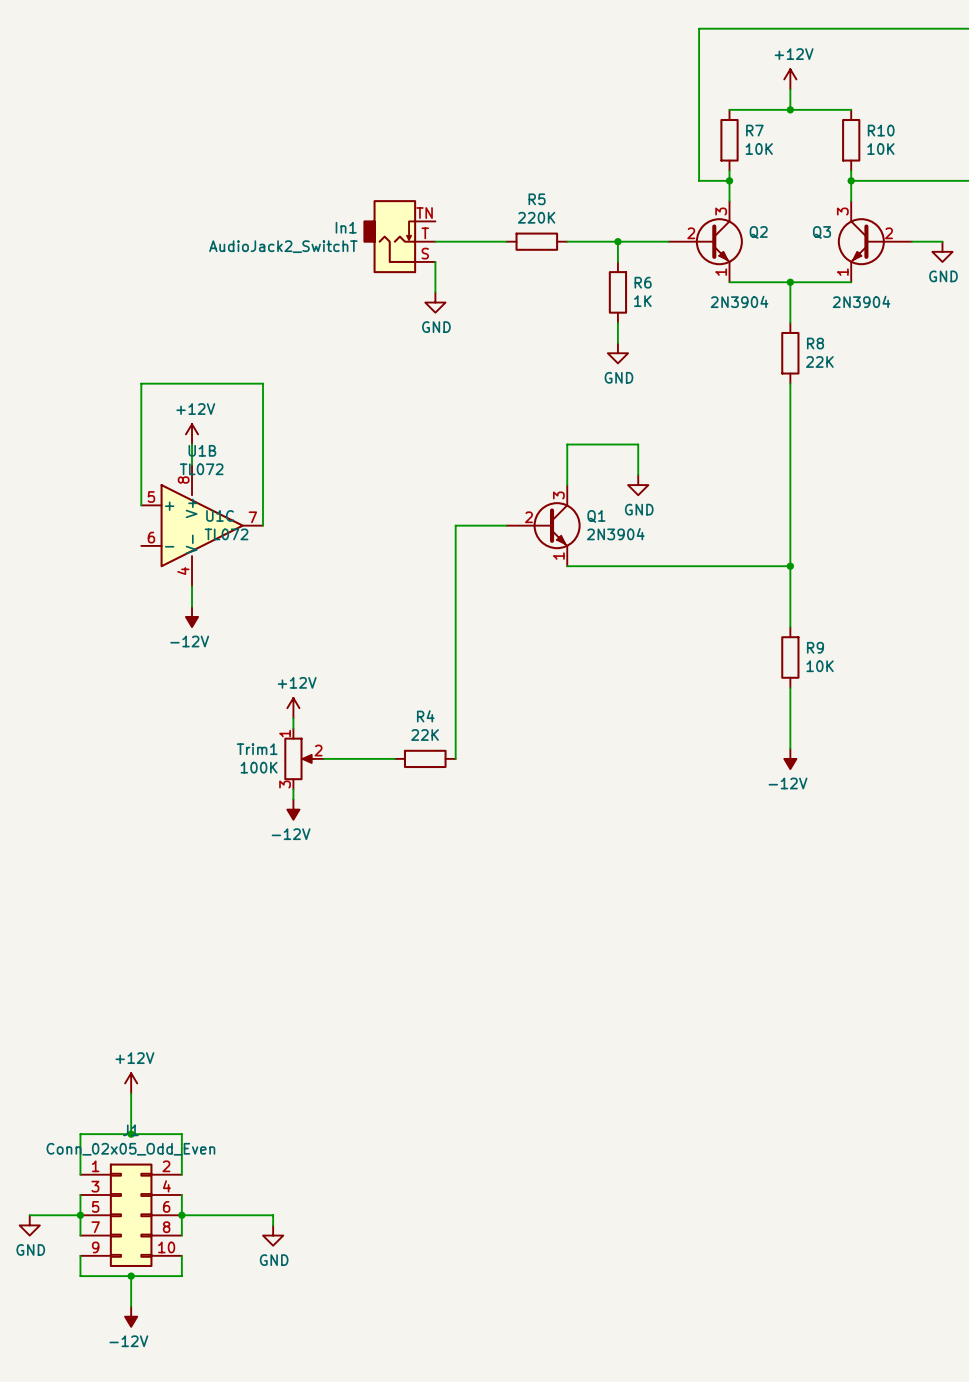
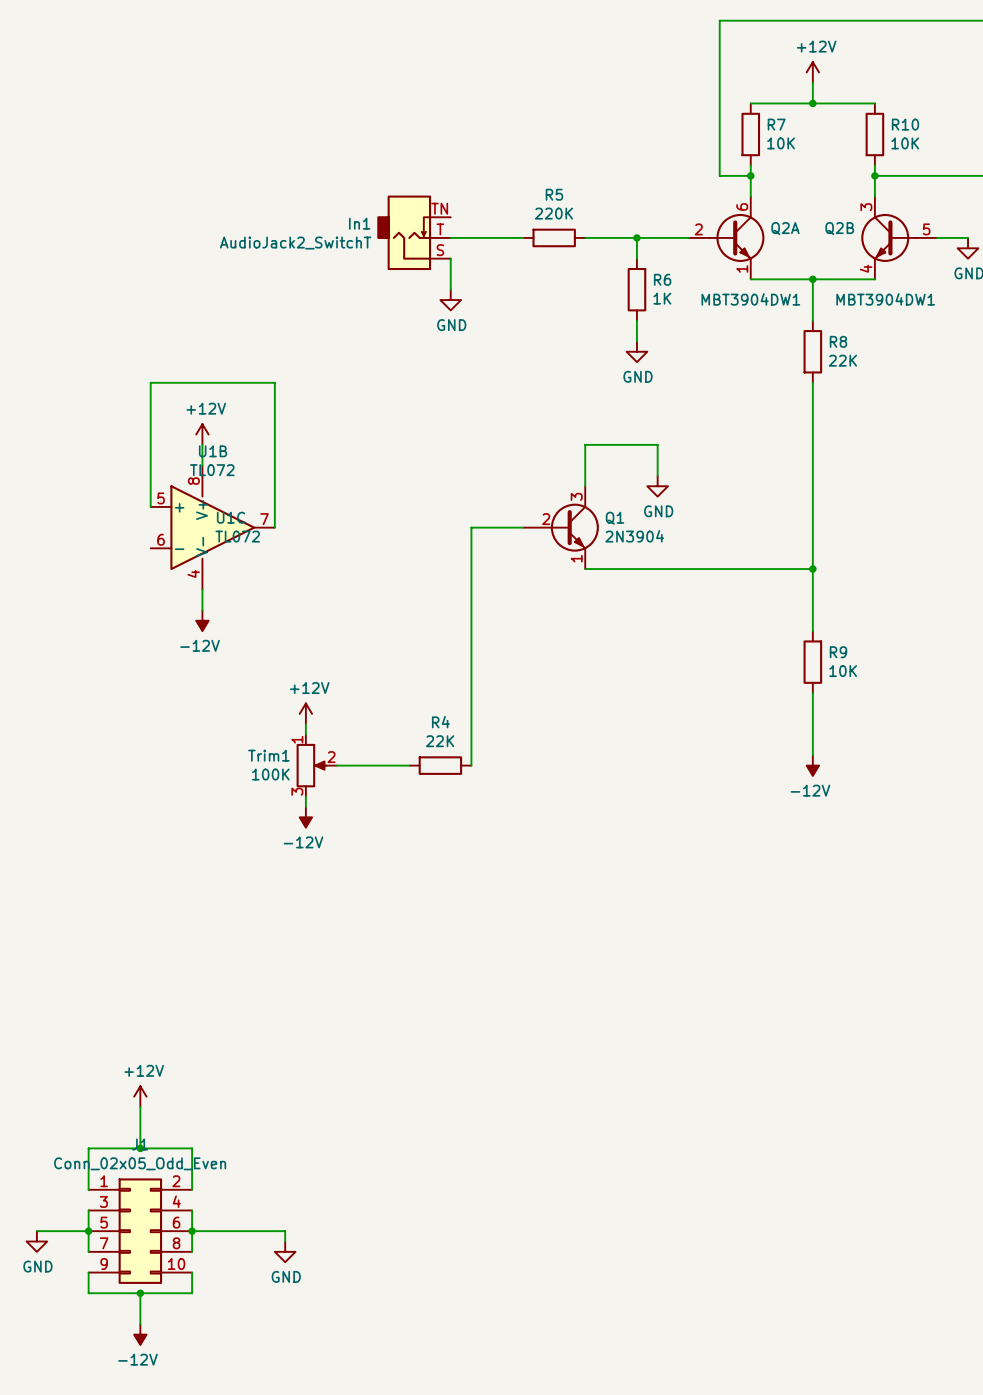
Q2: 2N3904 (705, 241) -> none
Q2A: none -> MBT3904DW1 (726, 237)
Q3: 2N3904 (874, 241) -> none
Q2B: none -> MBT3904DW1 (899, 237)

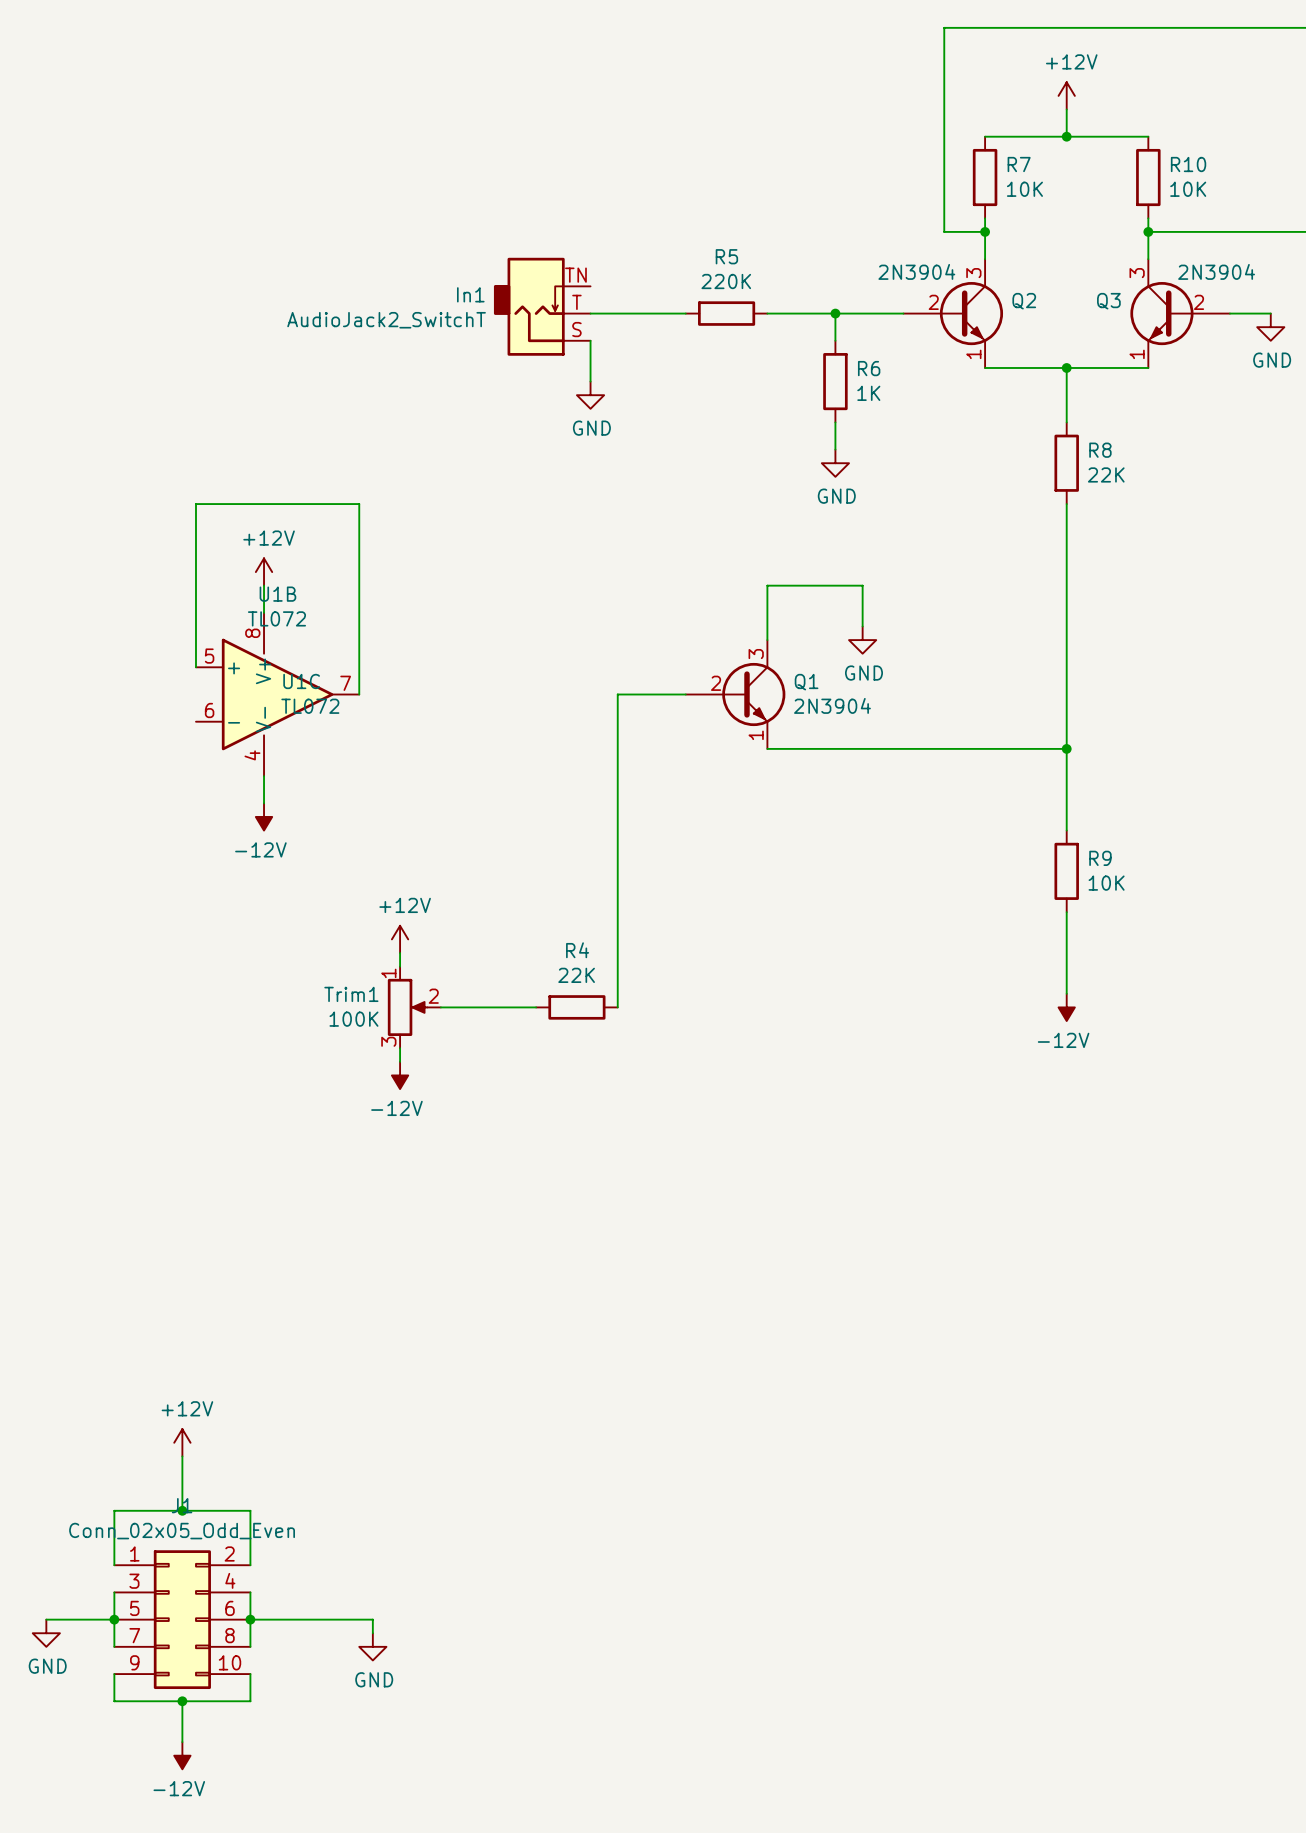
Q2A: MBT3904DW1 (726, 237) -> none
Q2: none -> 2N3904 (953, 313)
Q2B: MBT3904DW1 (899, 237) -> none
Q3: none -> 2N3904 (1180, 313)

